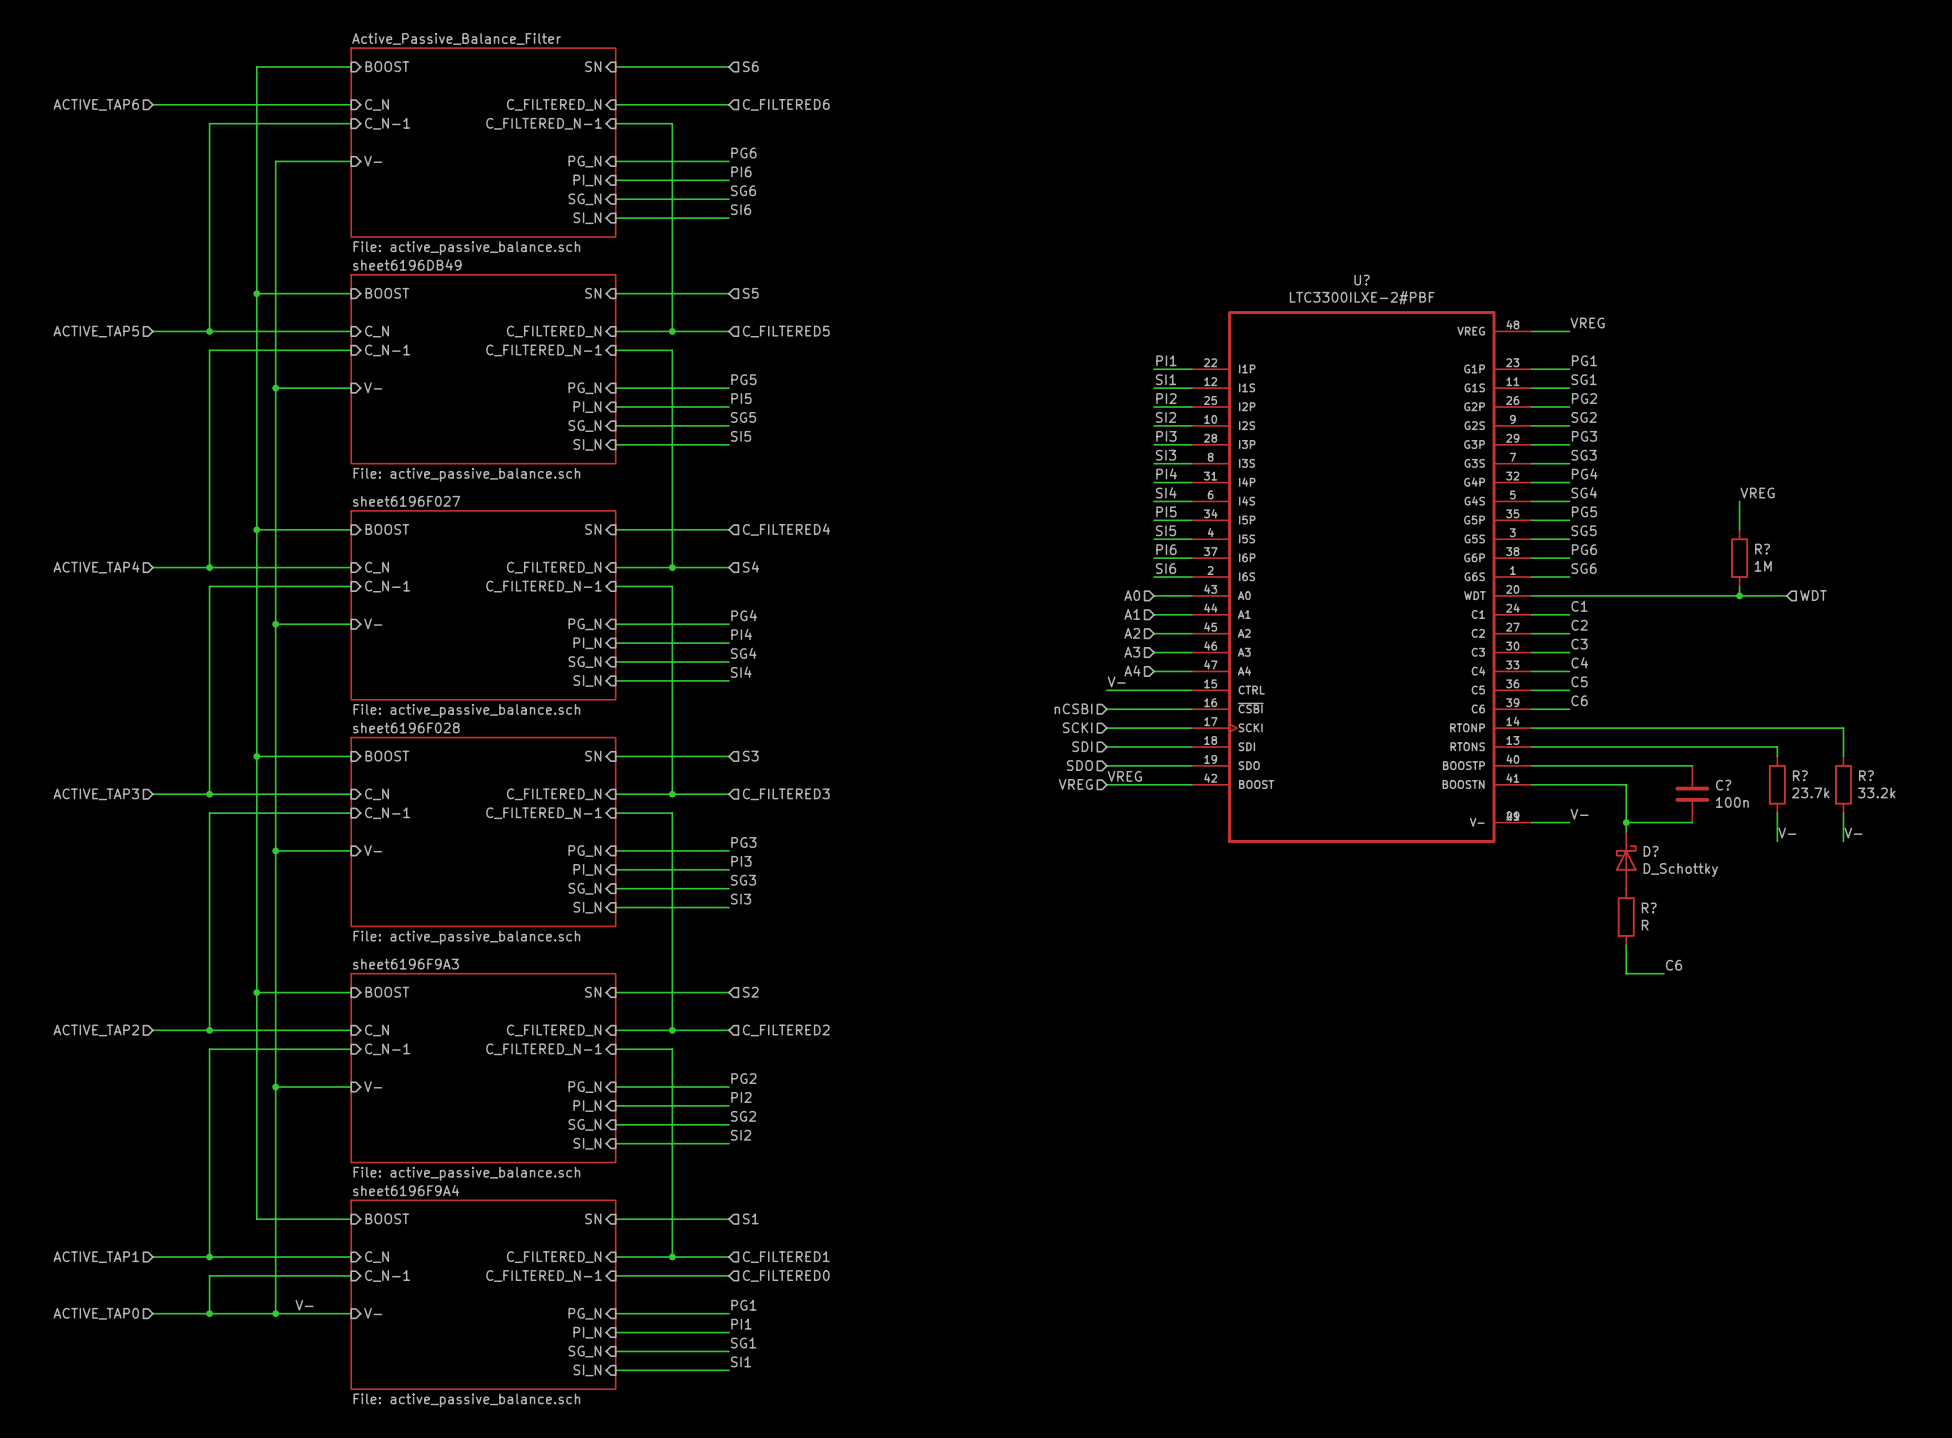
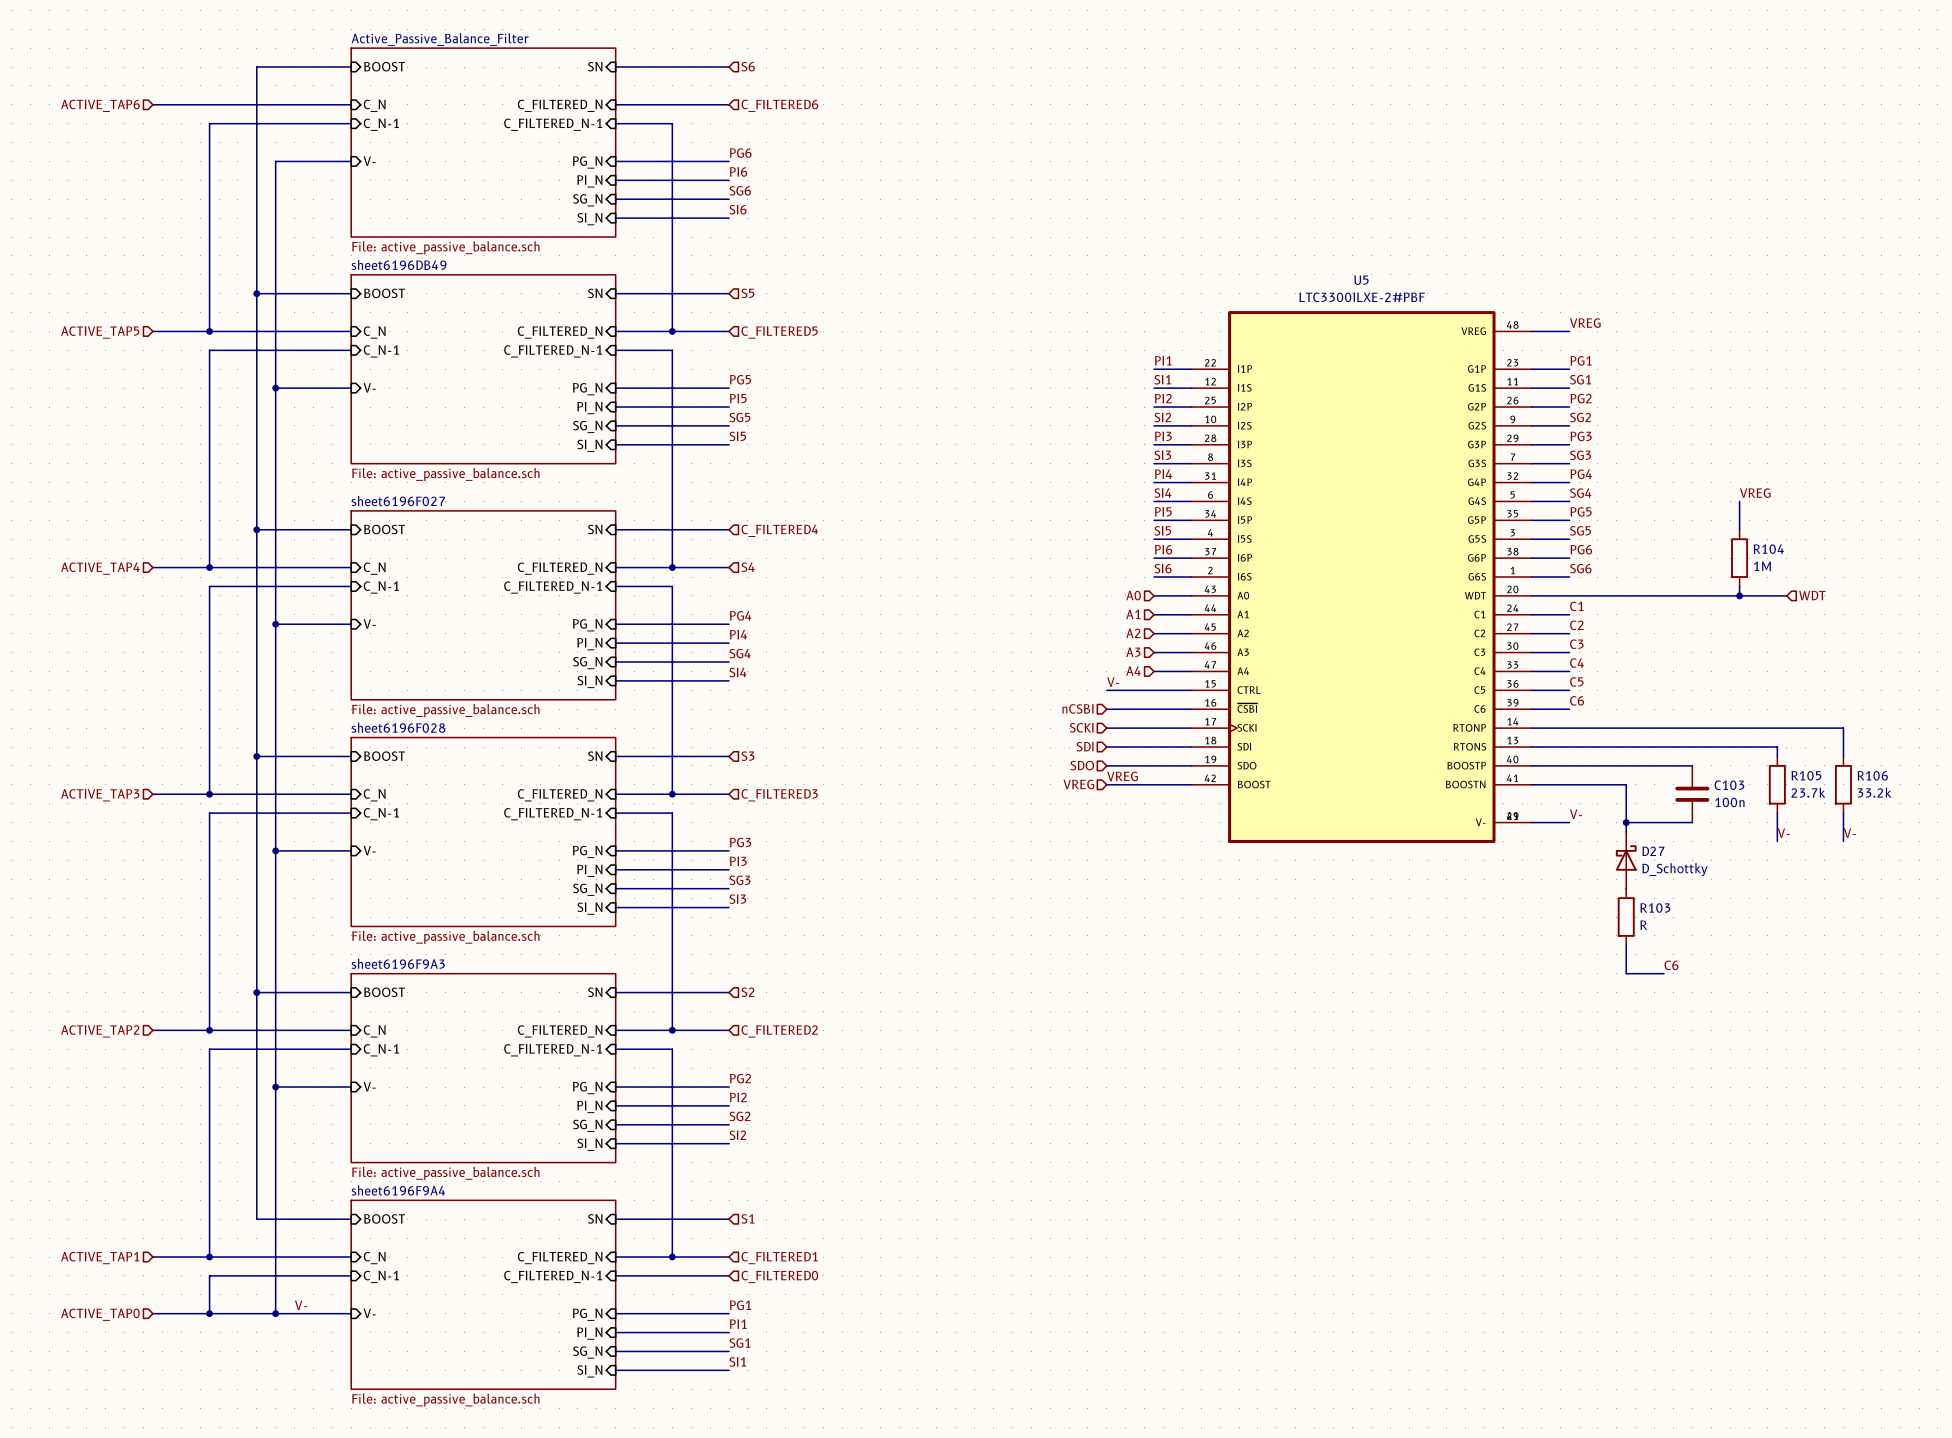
U? name: U? (1362, 280) -> U5 (1361, 280)
R? name: R? (1762, 549) -> R104 (1768, 549)
R? name: R? (1800, 775) -> R105 (1806, 775)
R? name: R? (1866, 775) -> R106 (1872, 775)
C? name: C? (1723, 785) -> C103 (1729, 785)
D? name: D? (1651, 851) -> D27 (1653, 851)
R? name: R? (1649, 907) -> R103 (1655, 908)

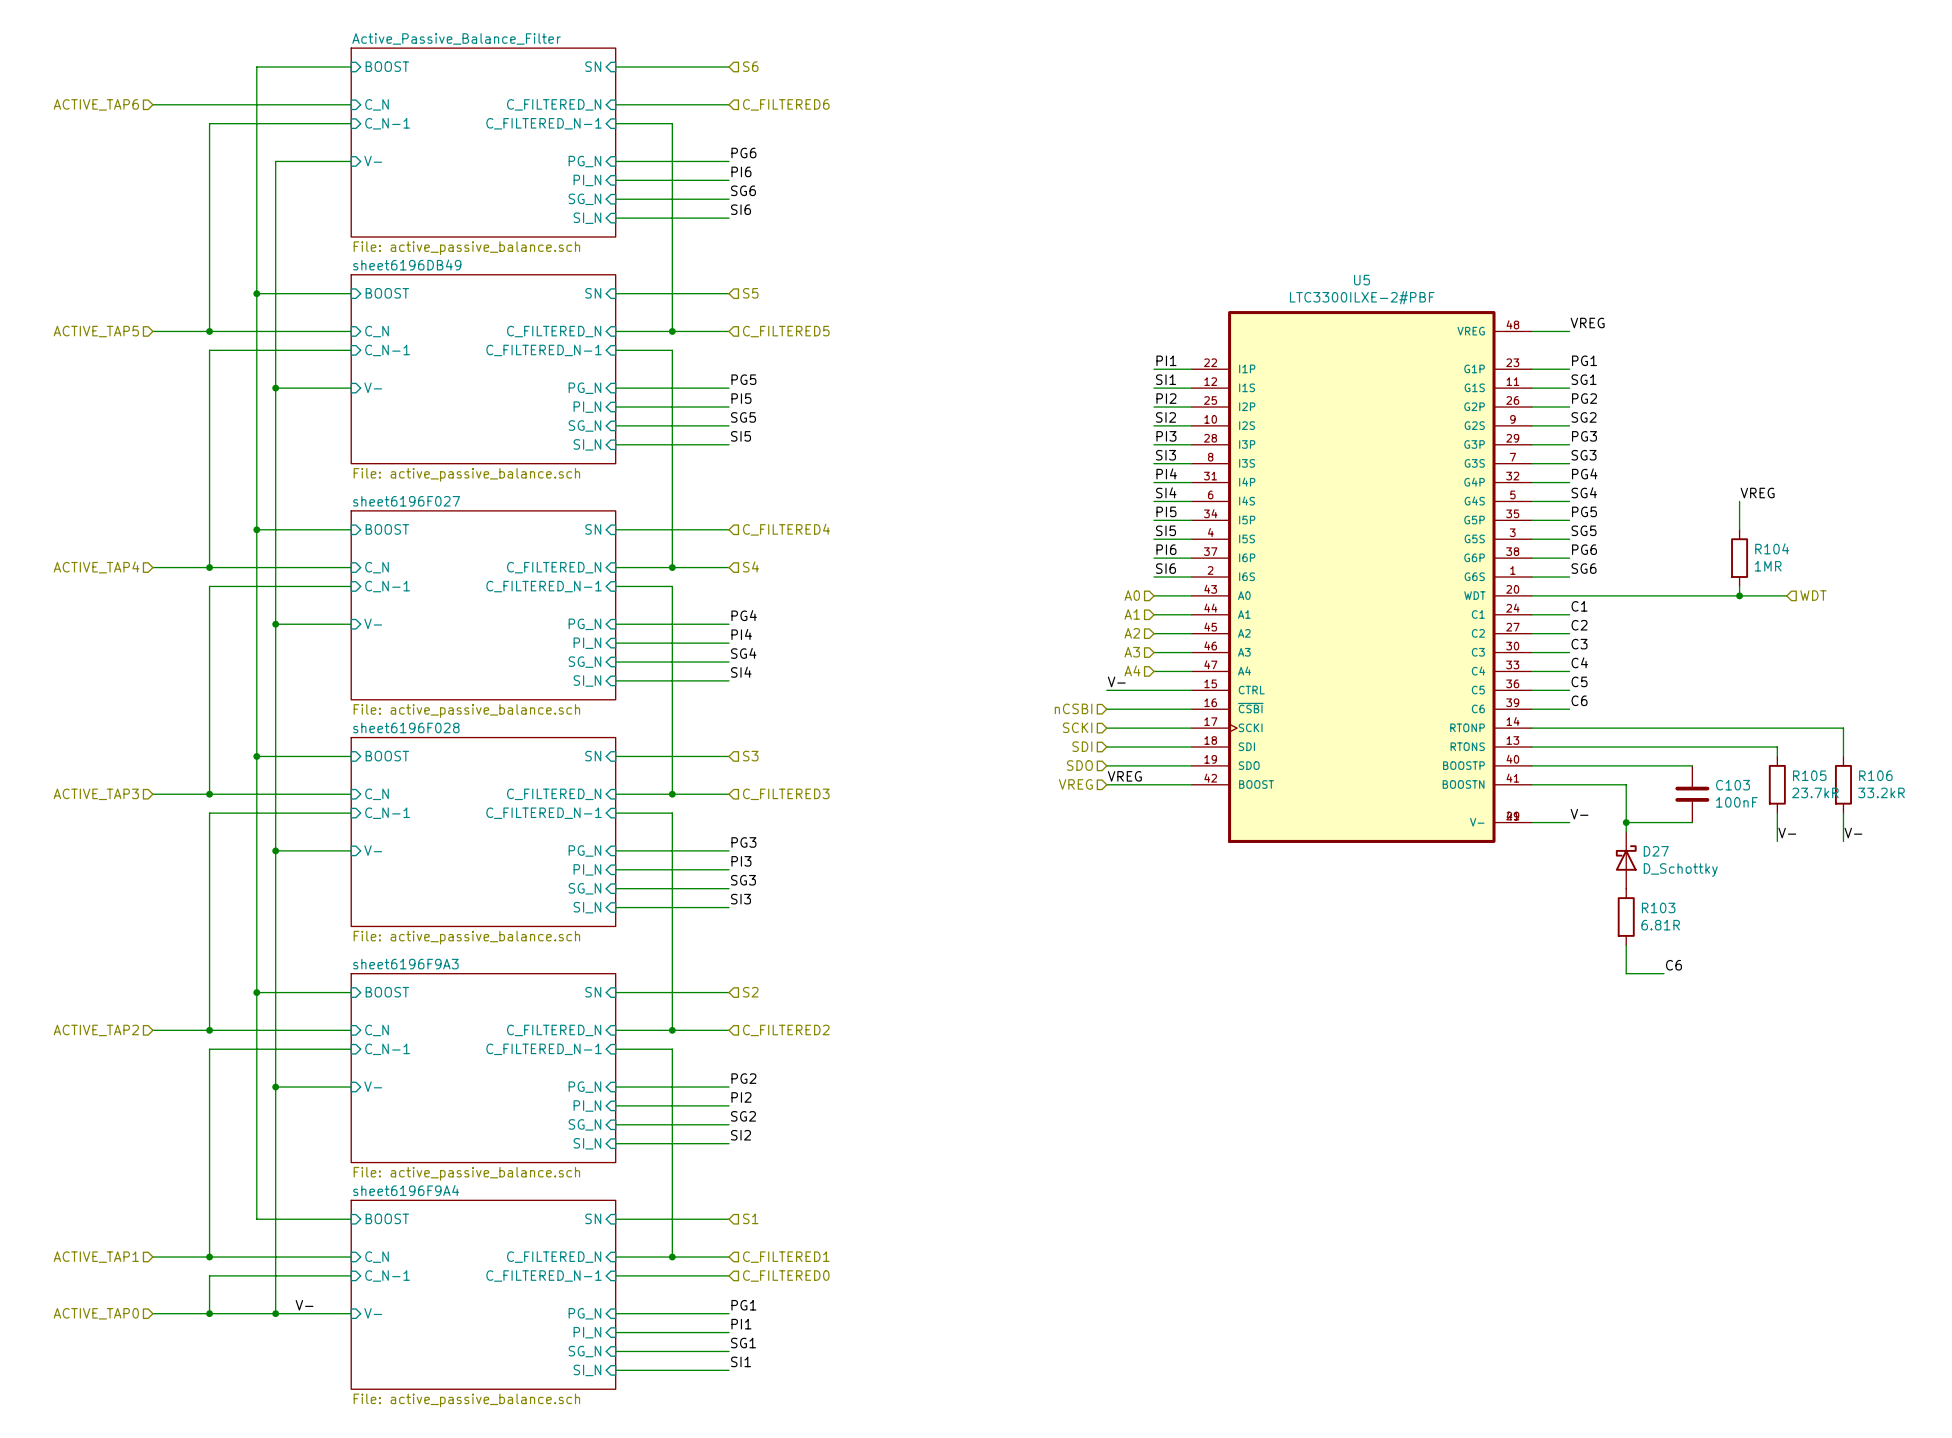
R104 value: 1M (1762, 566) -> 1MR (1768, 566)
R105 value: 23.7k (1808, 792) -> 23.7kR (1815, 792)
R106 value: 33.2k (1874, 792) -> 33.2kR (1881, 792)
C103 value: 100n (1729, 802) -> 100nF (1736, 802)
R103 value: R (1643, 925) -> 6.81R (1660, 925)

